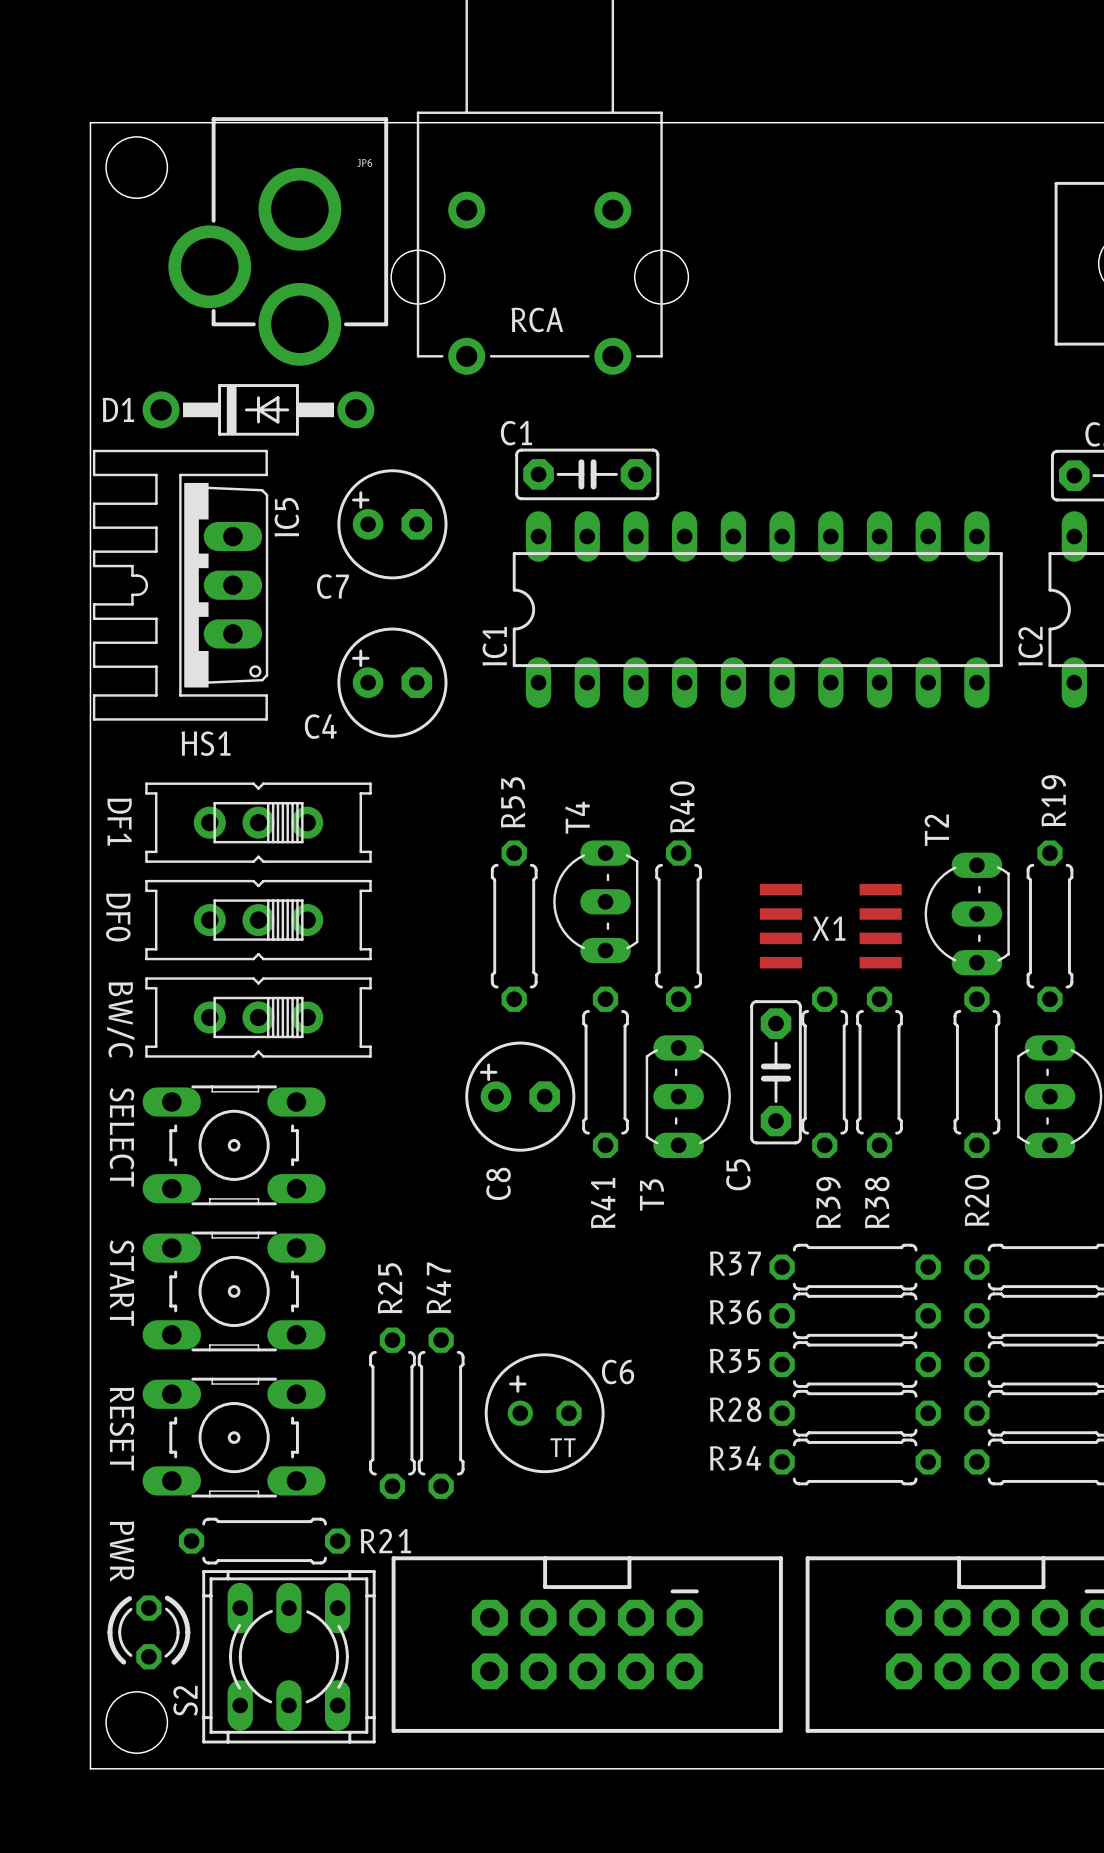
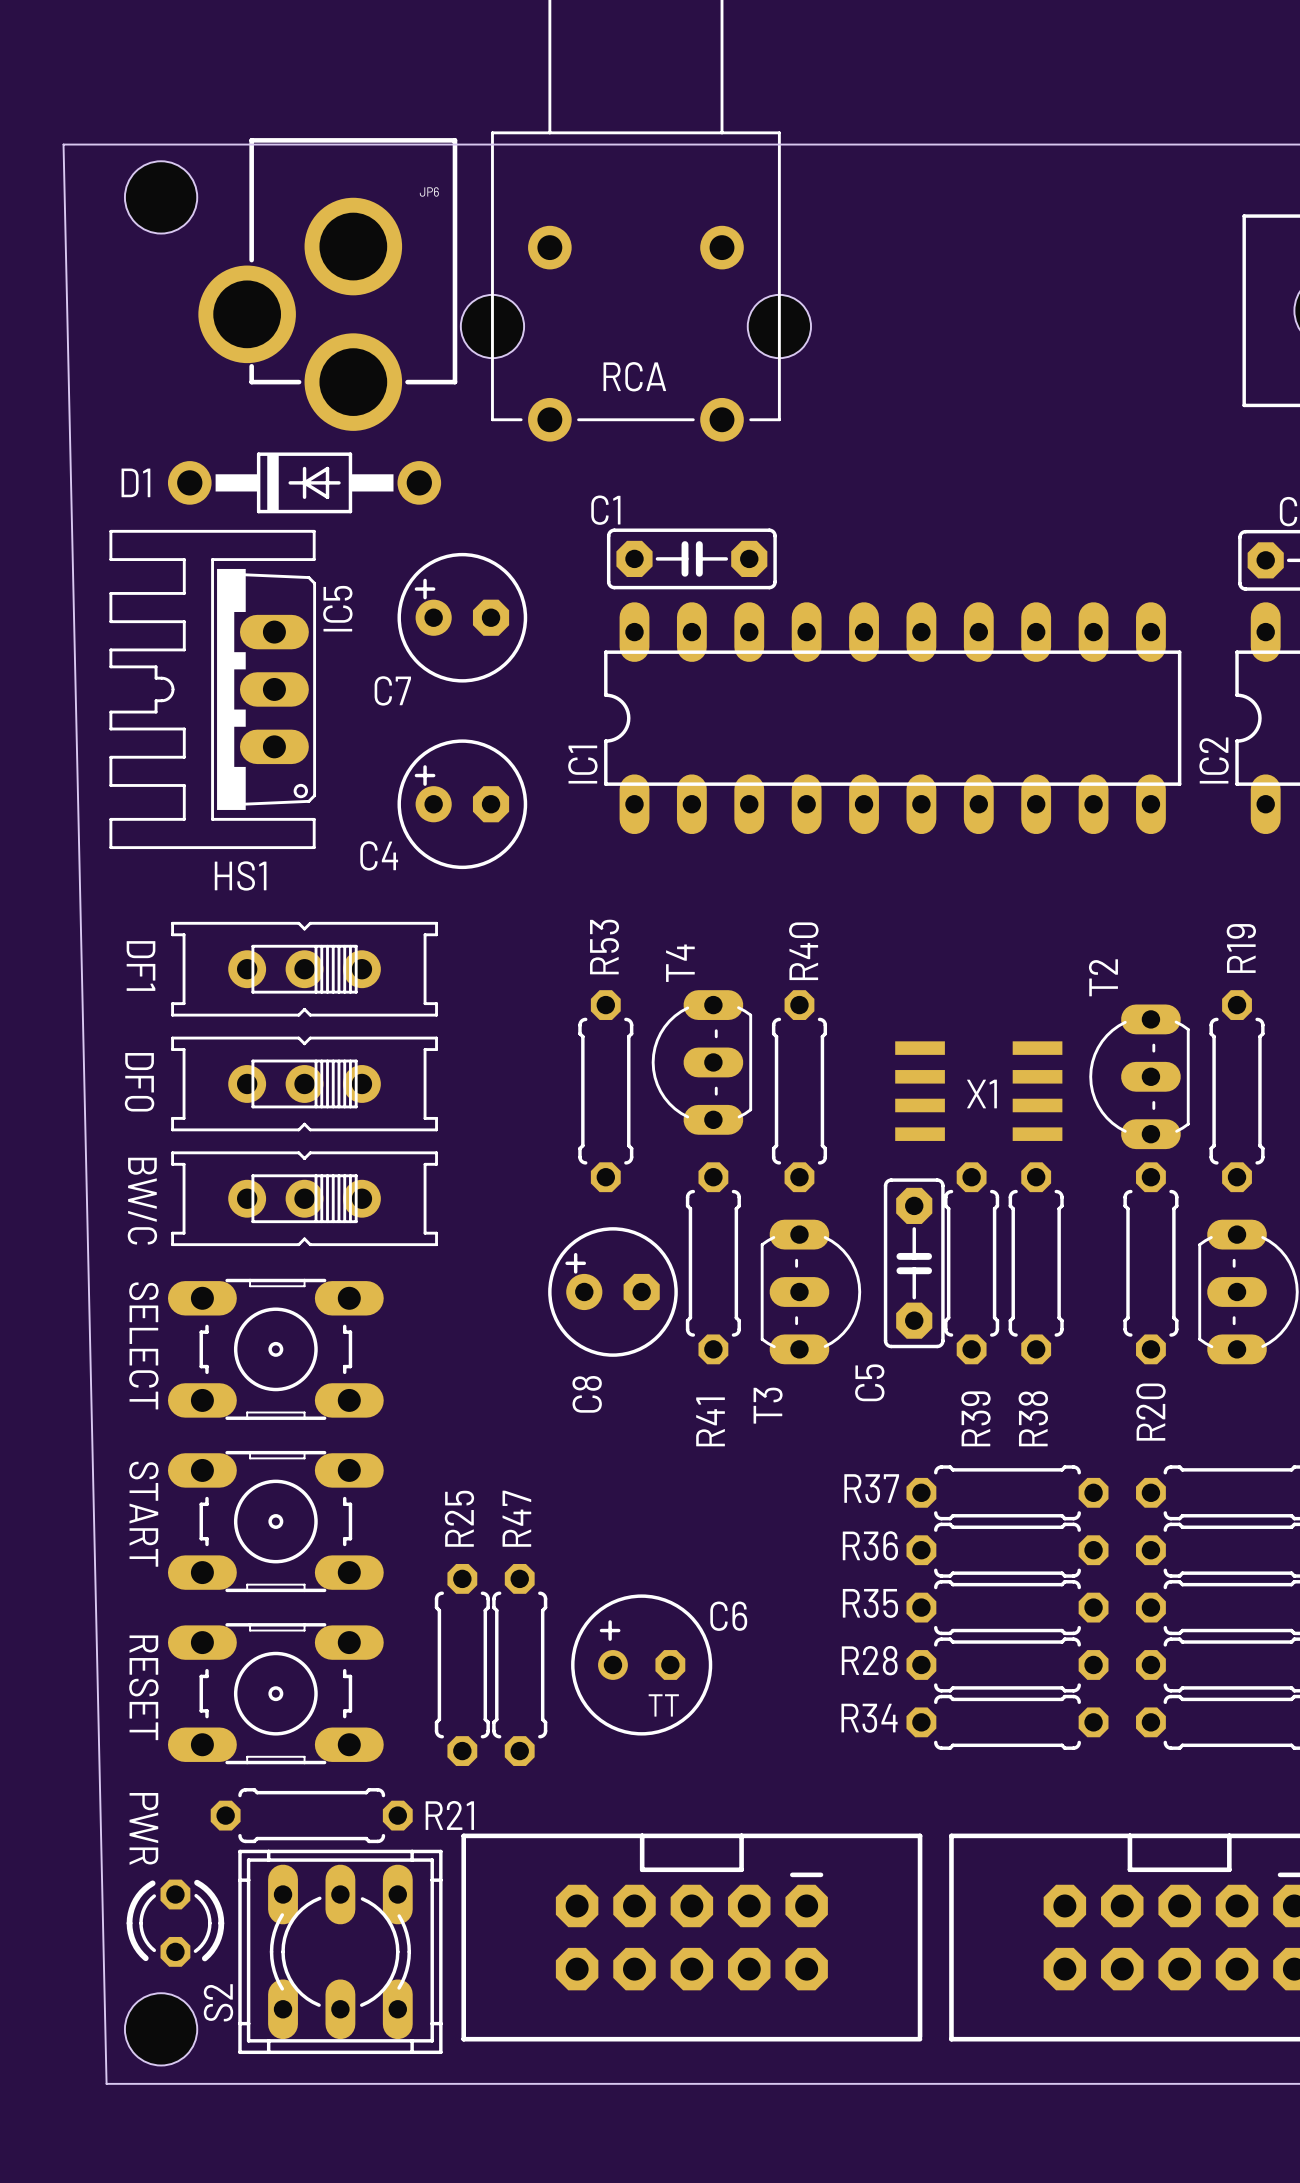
board edge: (90, 122) (90, 1768) -> (106, 144) (63, 144) (106, 2083)

